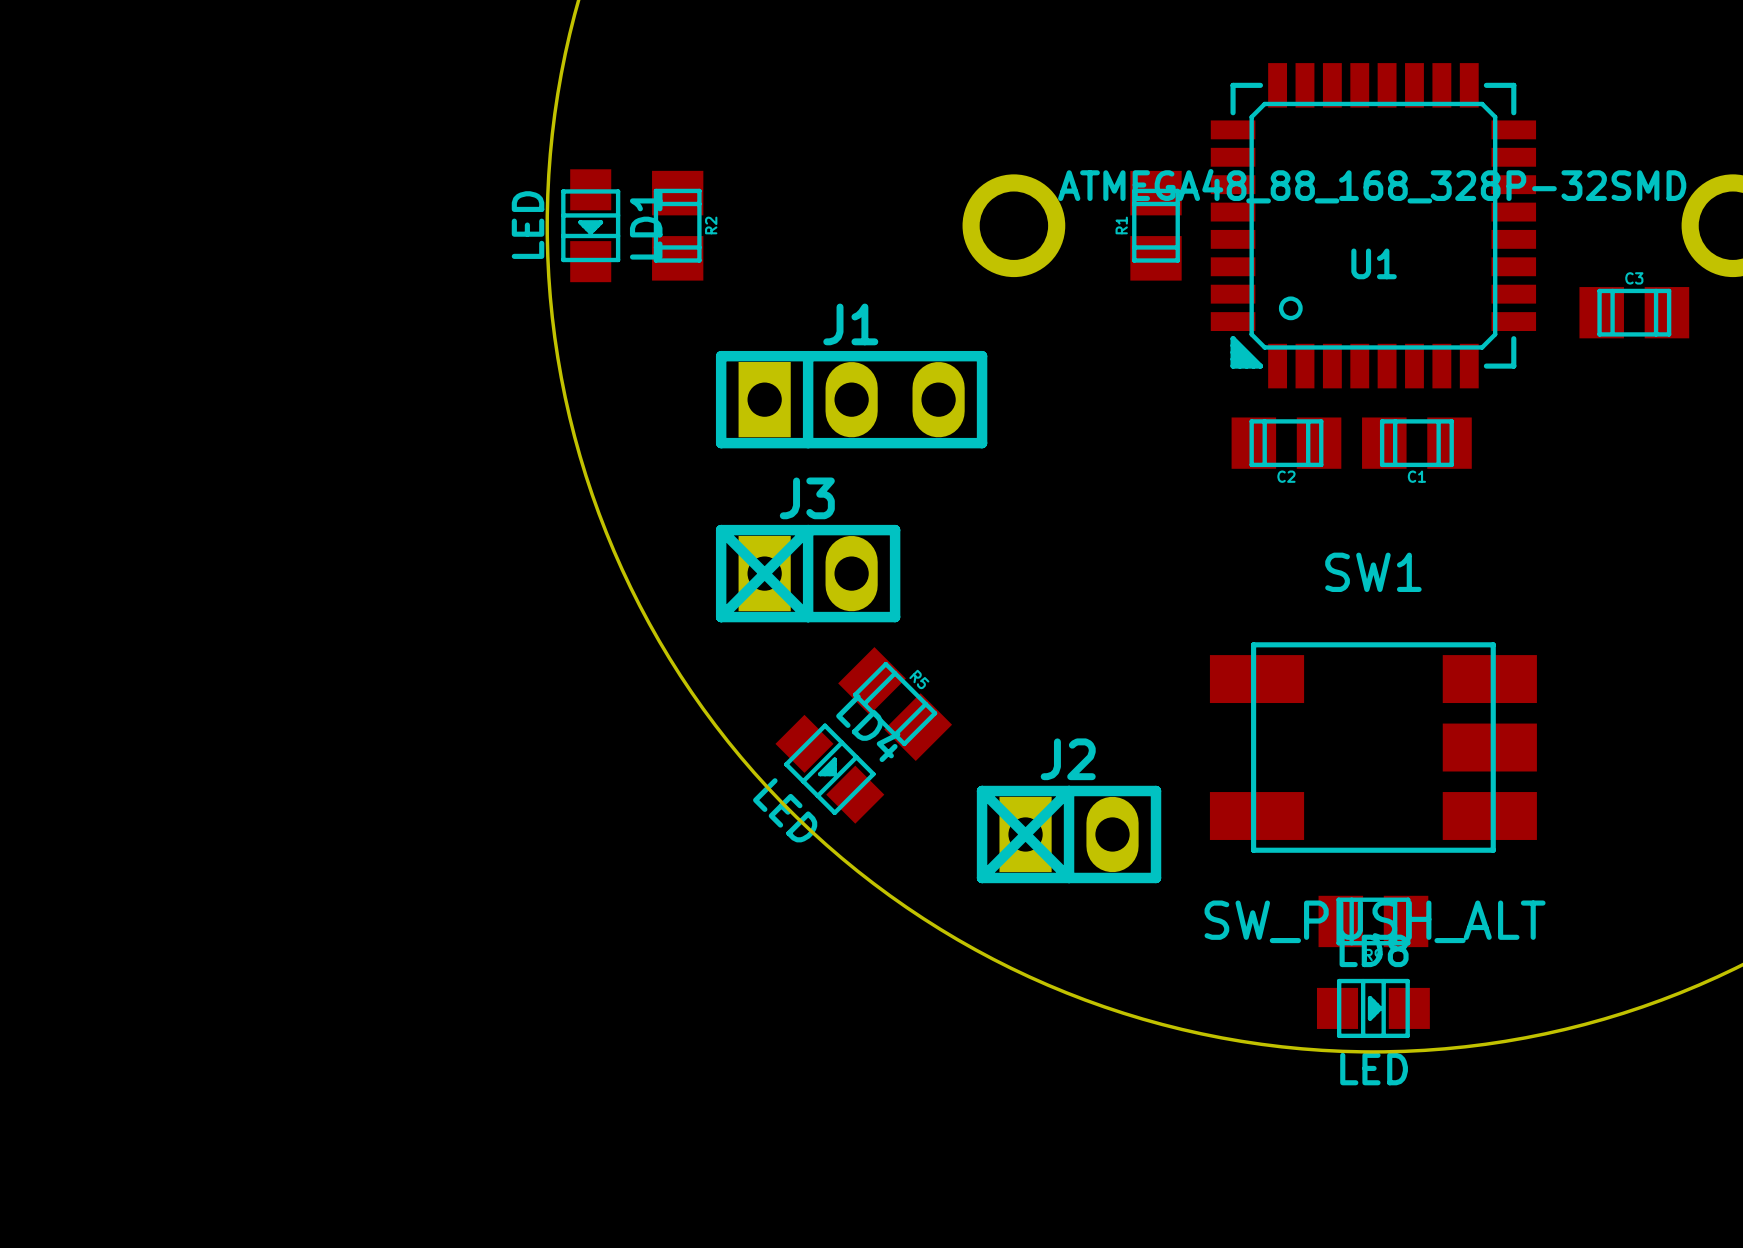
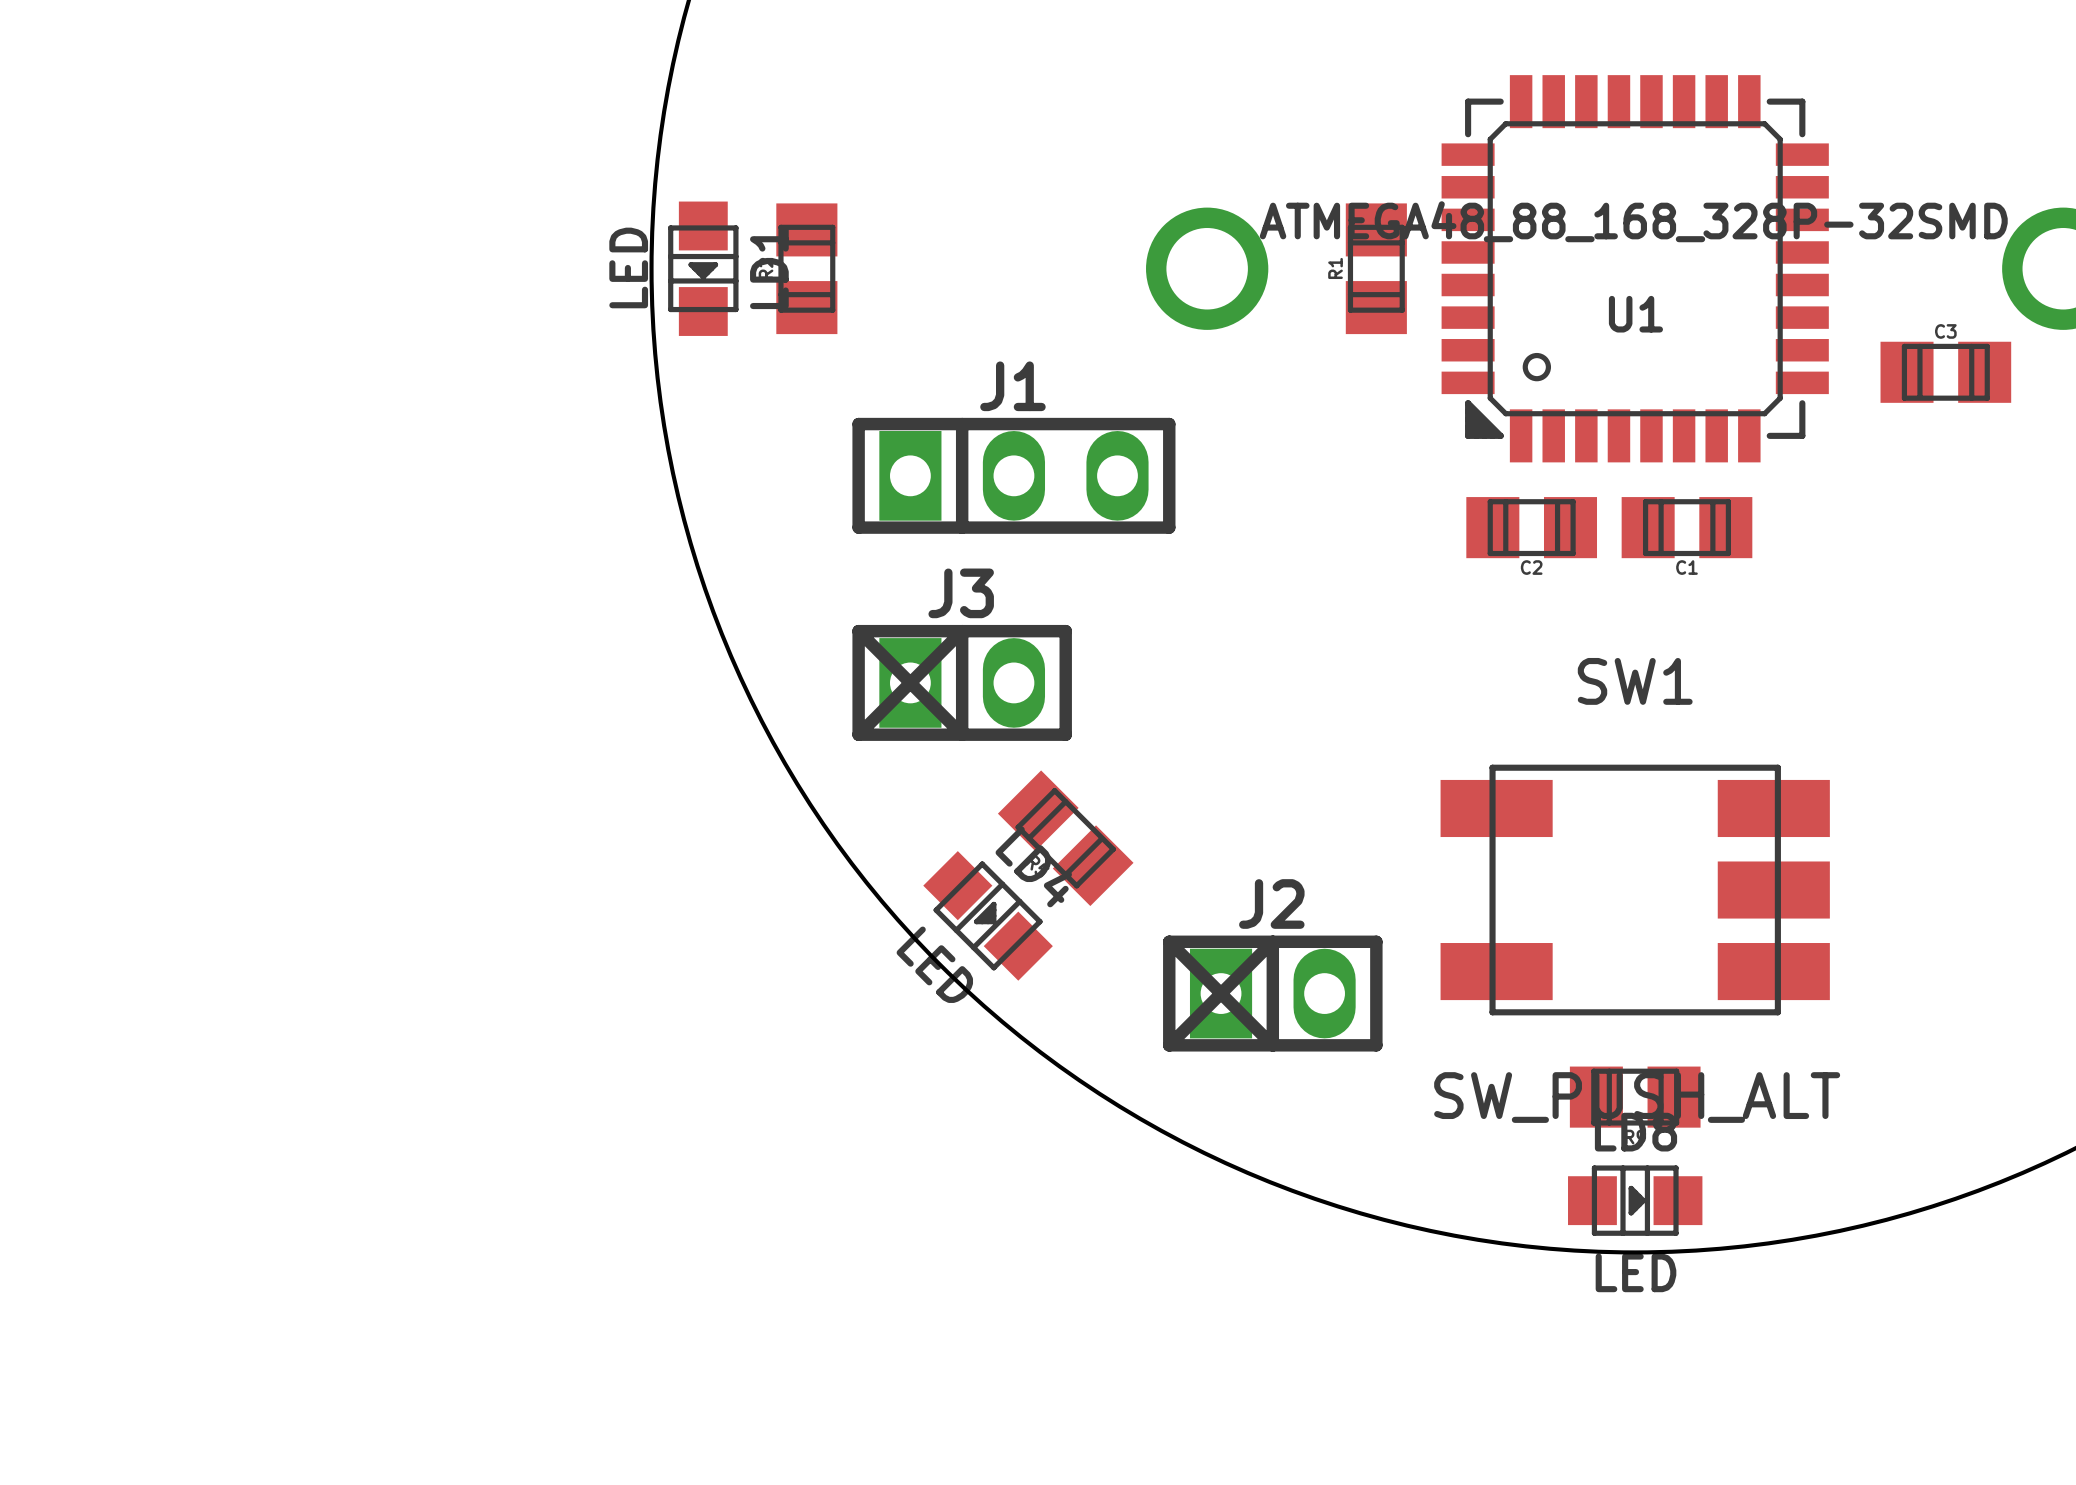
R2 rotation: 0° (677, 225) -> 180° (806, 268)
R5 rotation: 0° (895, 704) -> 180° (1065, 838)

